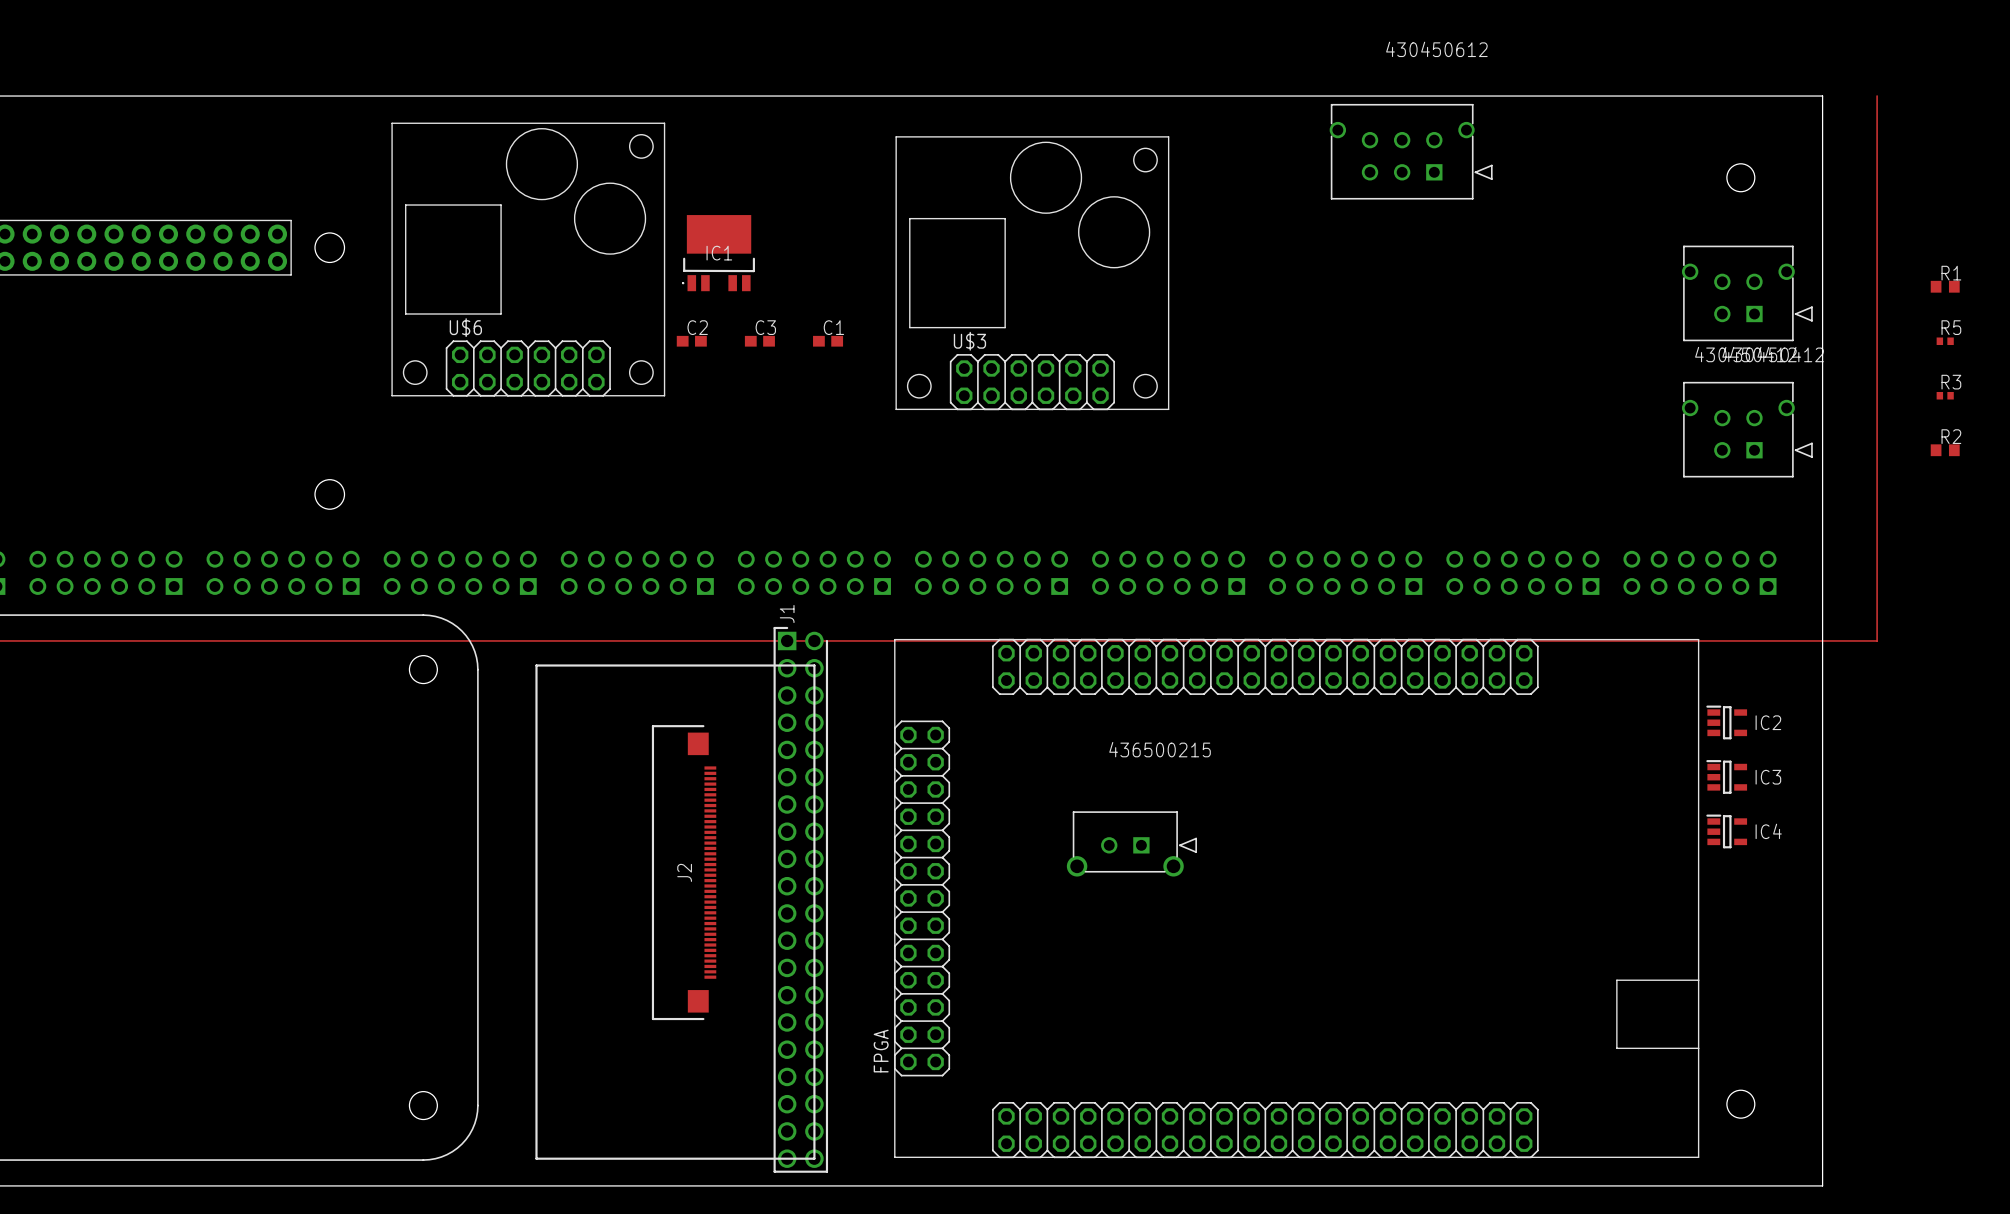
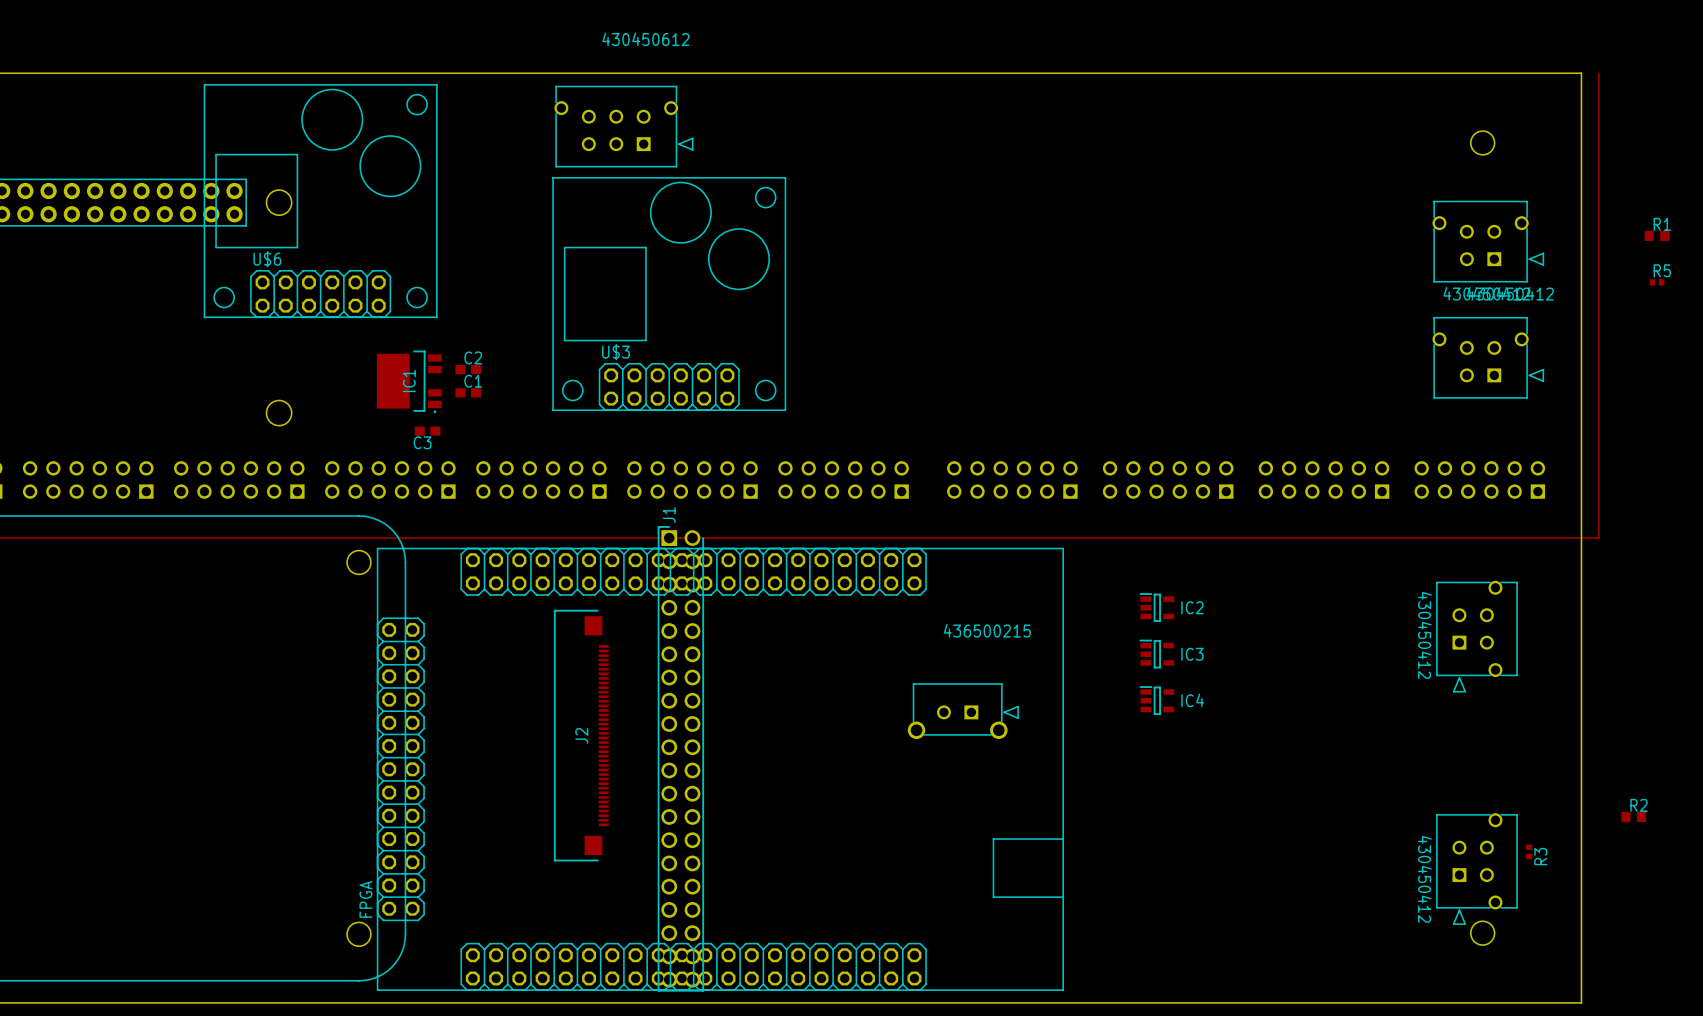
board edge: (1822, 96) (1822, 1185) -> (1552, 73) (1581, 73) (1581, 1002) (1552, 1002)
part: 430450612 (1411, 151) -> none
part: none -> 430450612 (623, 126)
IC1 rotation: 0° (718, 253) -> 90° counterclockwise (409, 381)
IC1 position: (718, 253) -> (409, 381)
U$6 position: (528, 259) -> (320, 201)
U$3 position: (1032, 273) -> (669, 294)
C3 name position: C3 (765, 327) -> C3 (422, 442)
C2 position: (691, 341) -> (468, 369)
C3 position: (759, 341) -> (427, 431)
C1 position: (828, 341) -> (468, 392)
R3 rotation: 0° (1945, 395) -> 90° clockwise (1529, 851)
R3 position: (1945, 395) -> (1529, 851)
R2 position: (1945, 450) -> (1633, 816)
part position: (1168, 572) -> (1012, 479)
part position: (1345, 572) -> (1168, 479)
part position: (1522, 572) -> (1323, 479)
part position: (1699, 572) -> (1479, 479)
line: (536, 665) (536, 1158) (814, 1158) (814, 665) (536, 665) -> none
IC2 position: (1726, 722) -> (1156, 607)
part: none -> 430450412 (1476, 636)
IC3 position: (1726, 776) -> (1156, 654)
IC4 position: (1726, 831) -> (1156, 700)
FPGA: (1296, 898) -> none
FPGA: none -> (720, 769)
part: none -> 430450412 (1476, 869)

